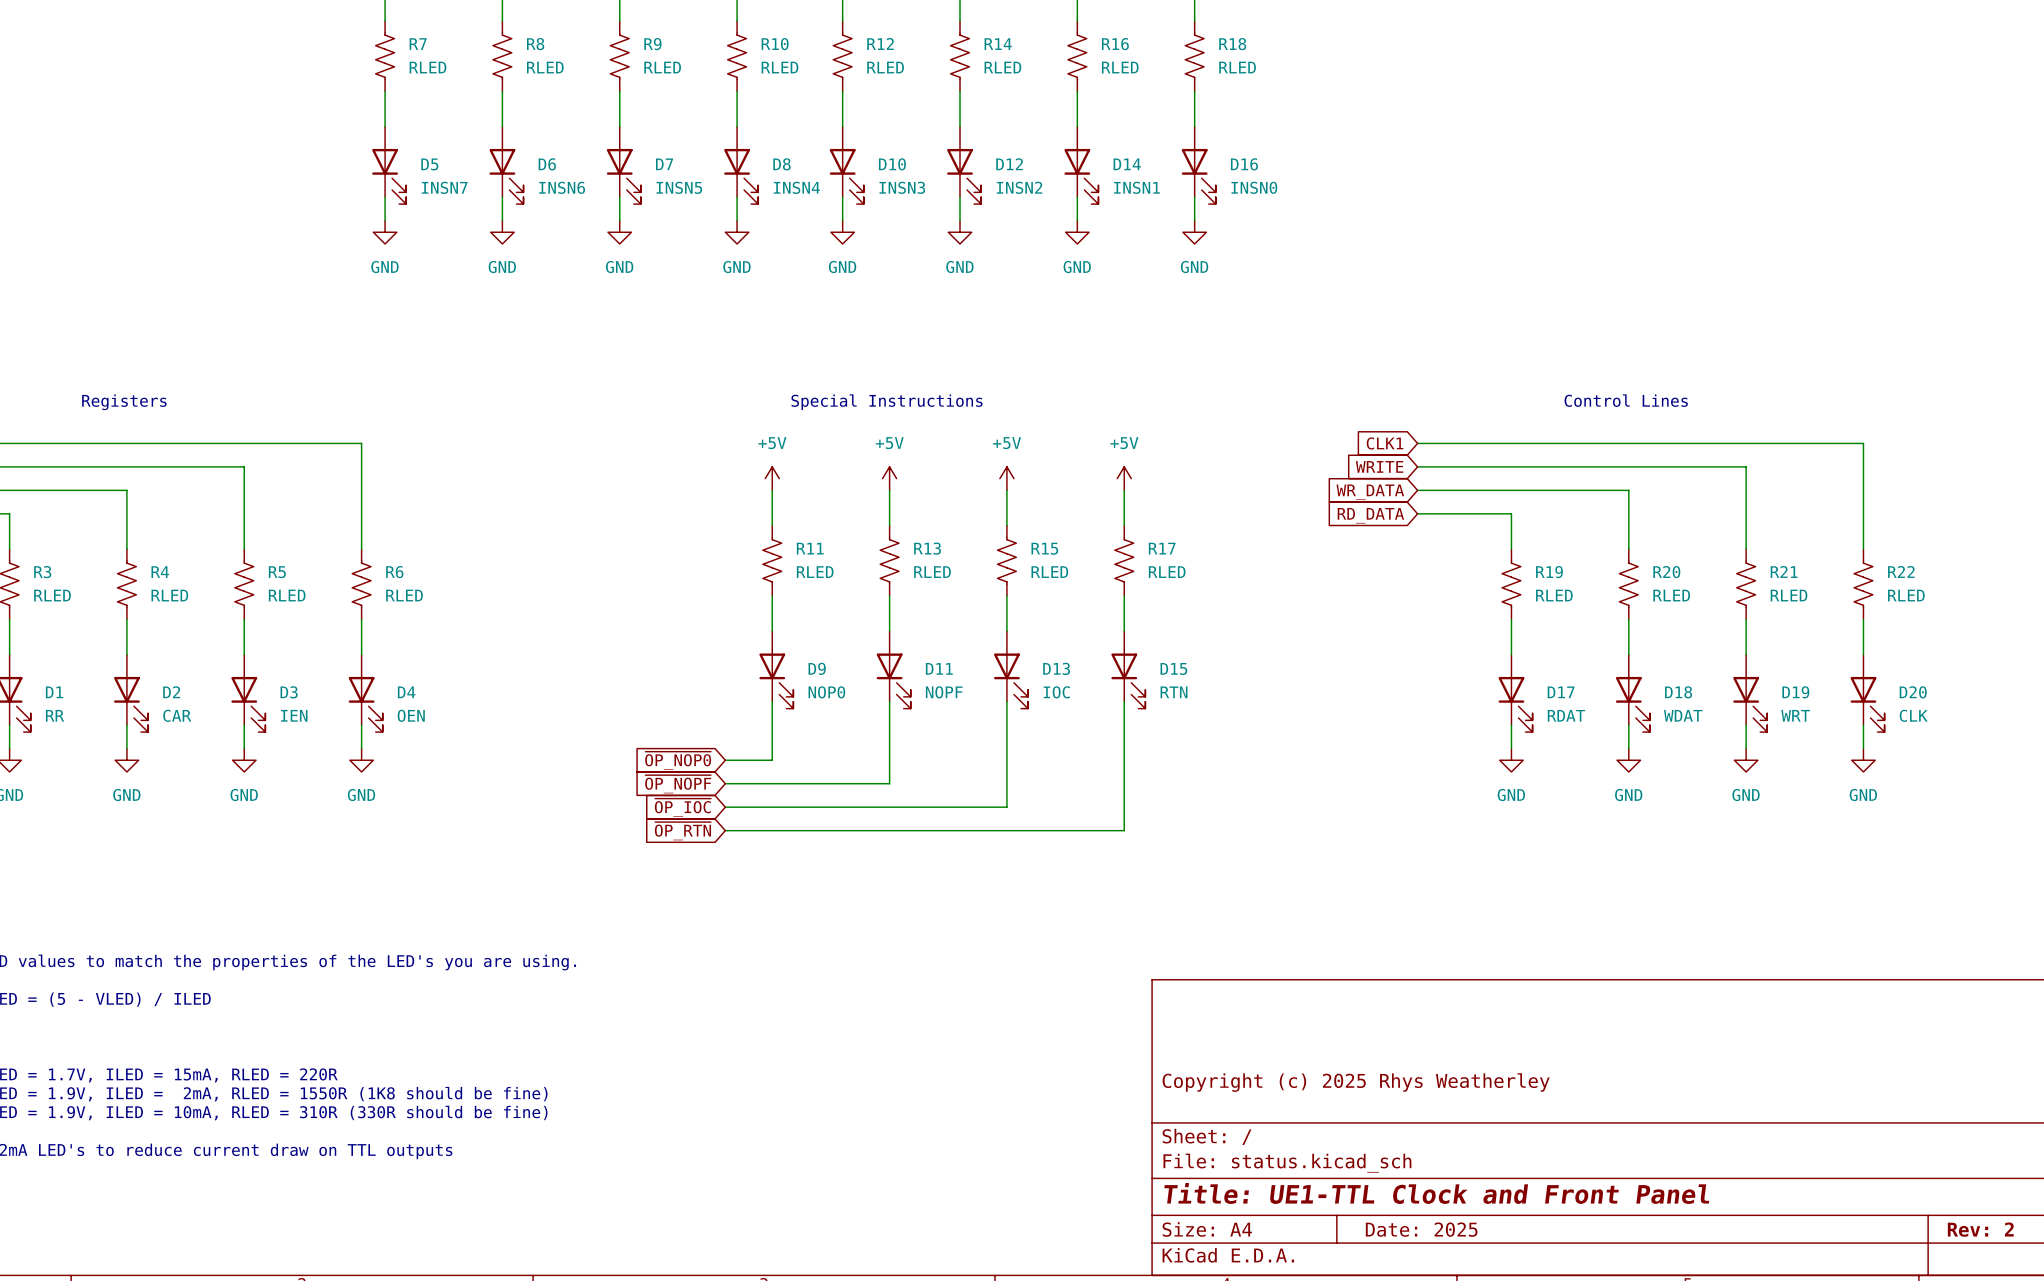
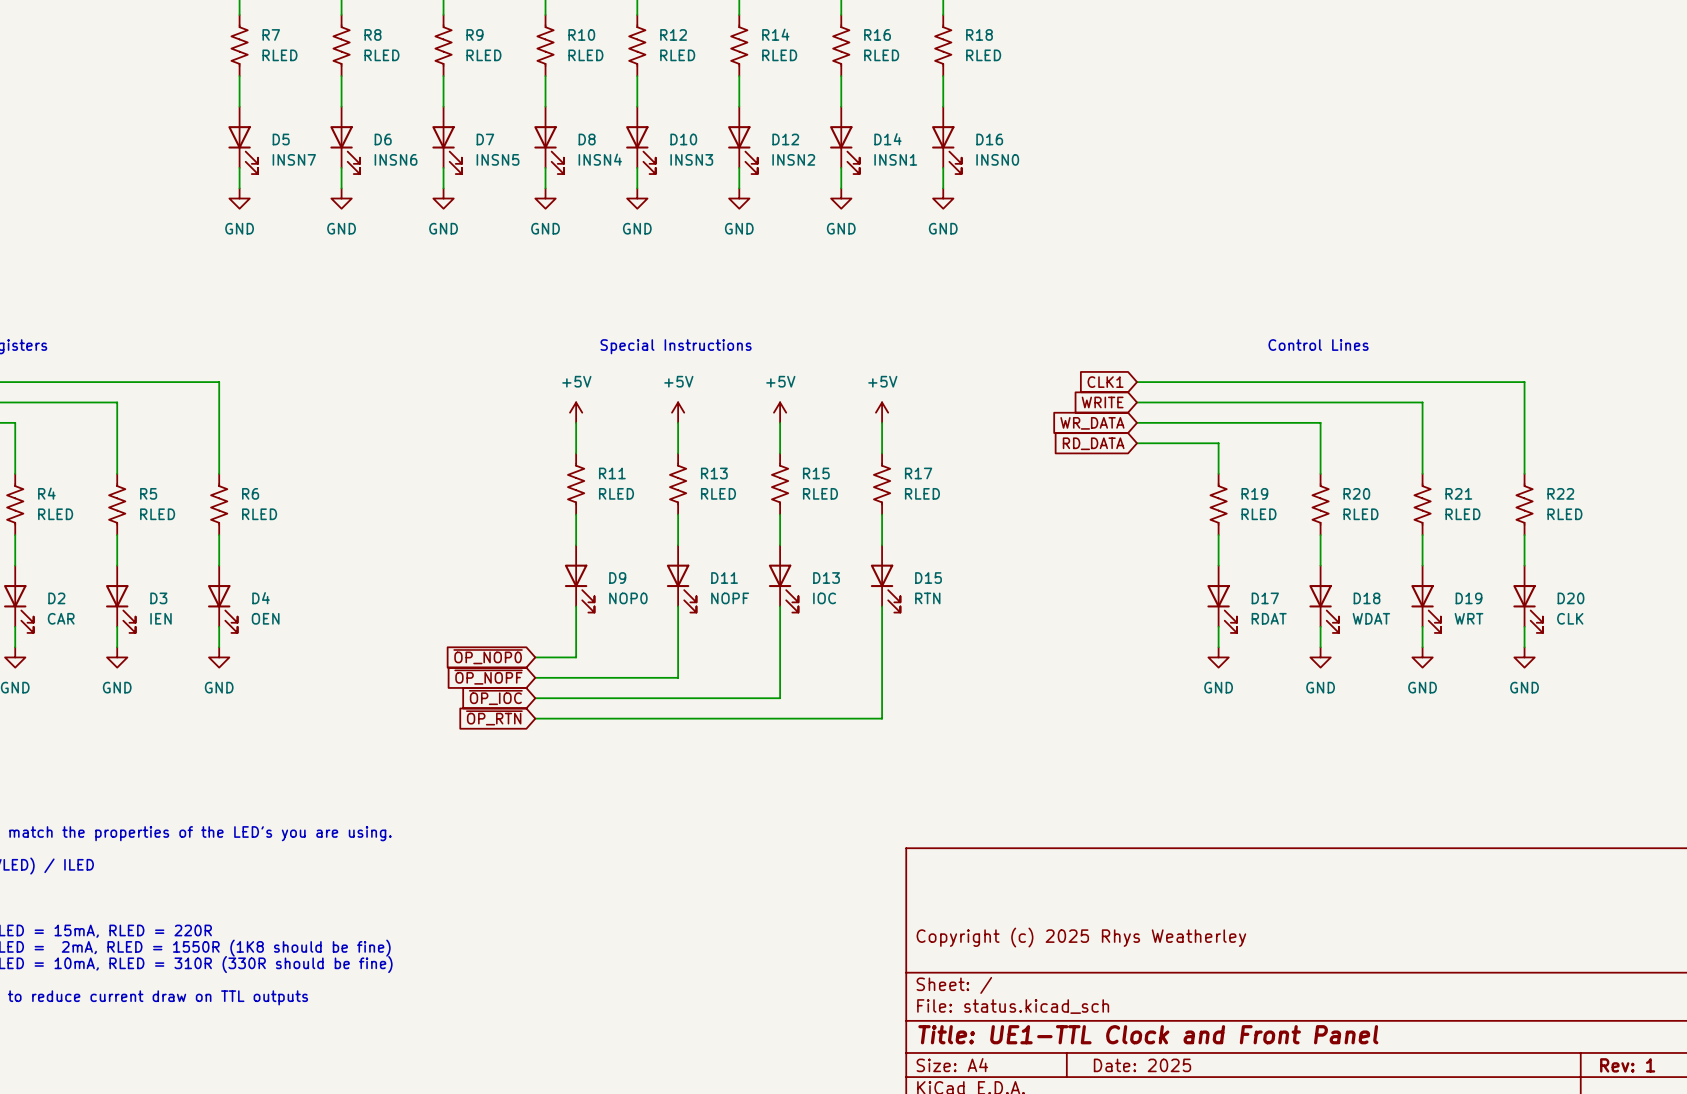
title block: Rev: 2 (1980, 1229) -> Rev: 1 (1627, 1065)

